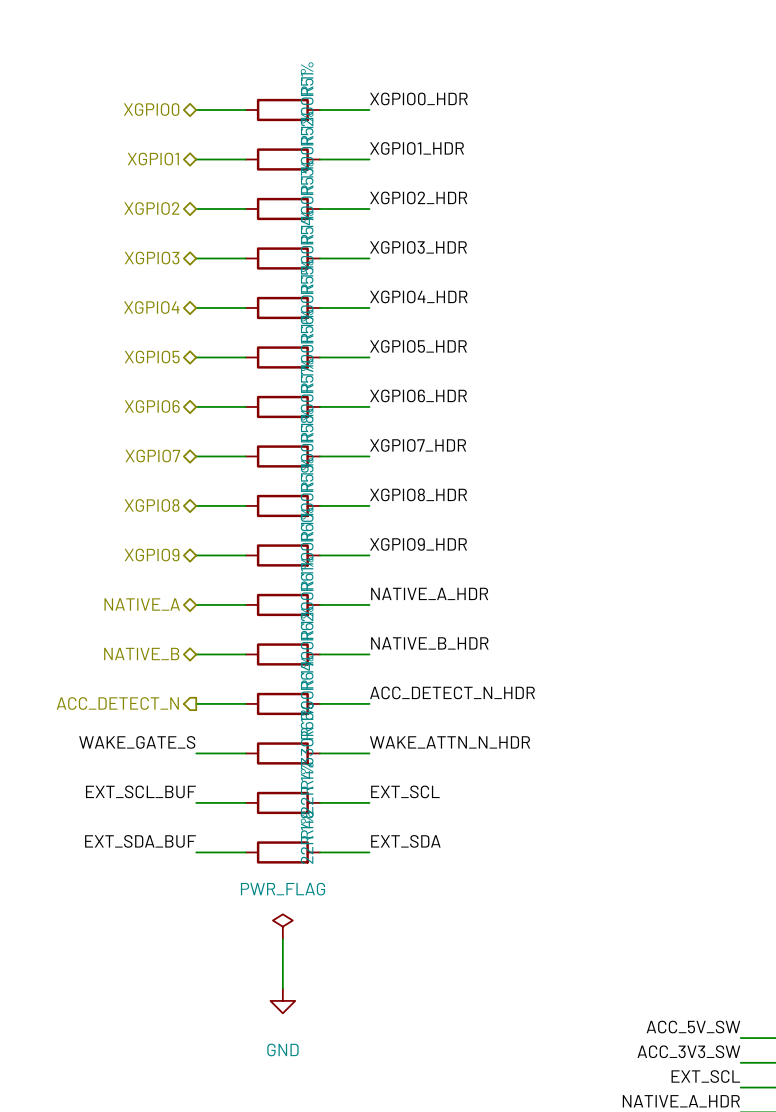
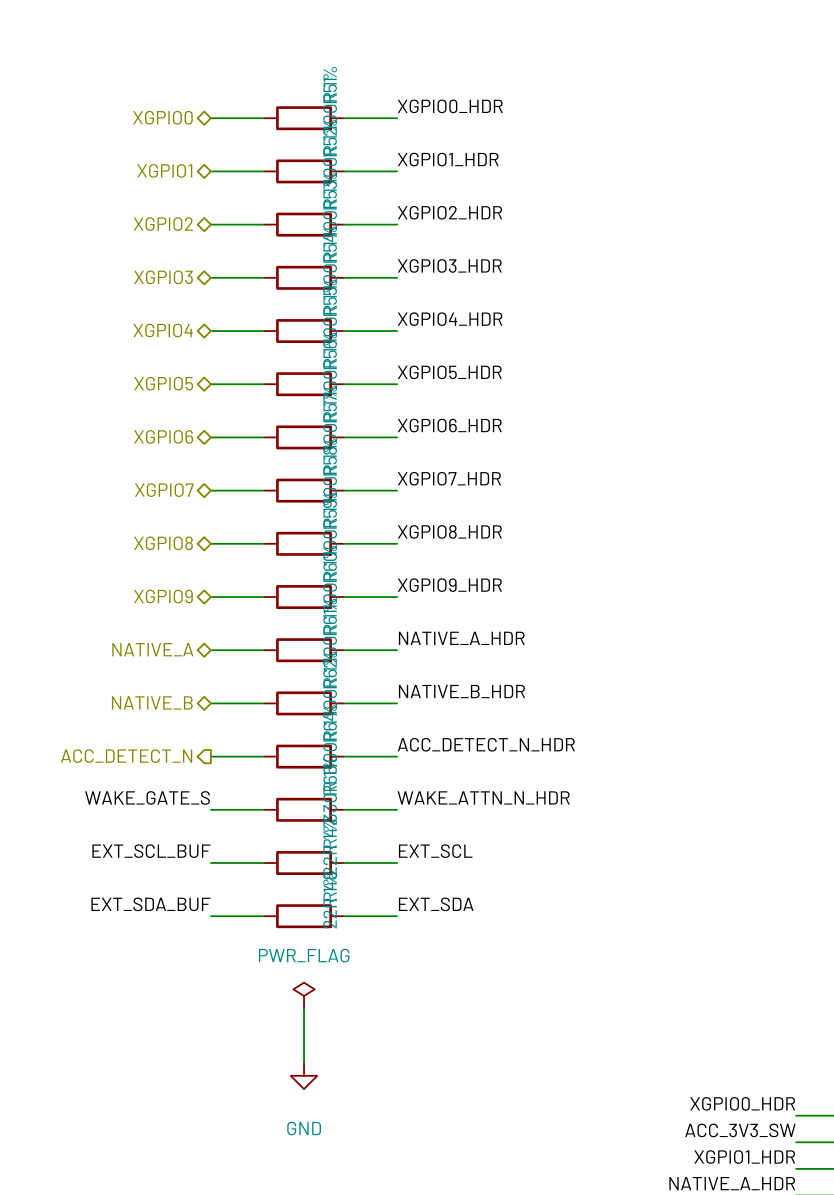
label: ACC_5V_SW (693, 1027) -> XGPIO0_HDR (742, 1103)
label: EXT_SCL (705, 1076) -> XGPIO1_HDR (744, 1157)

